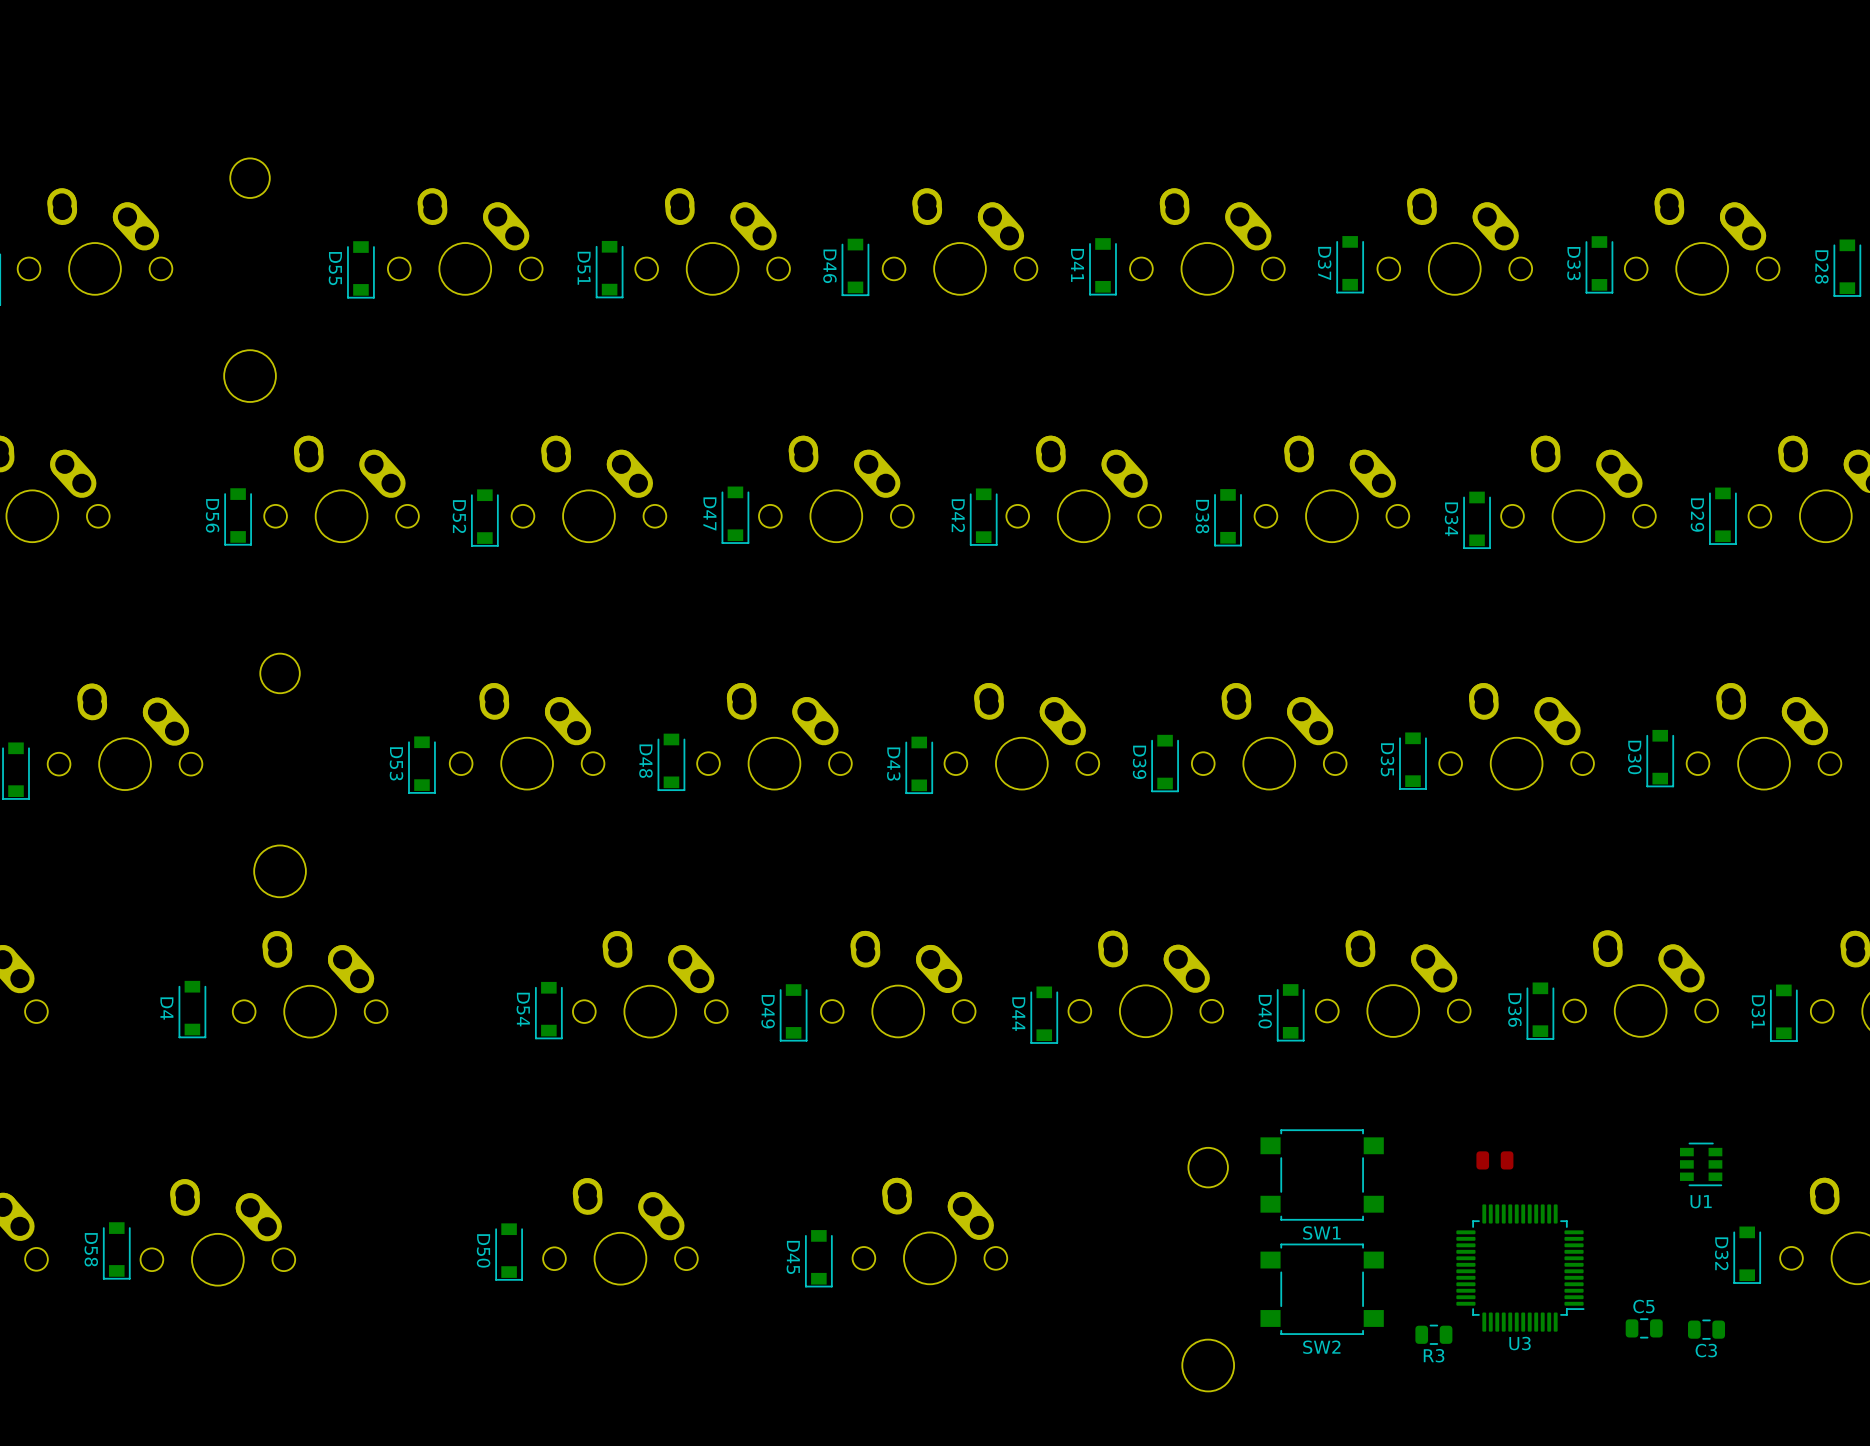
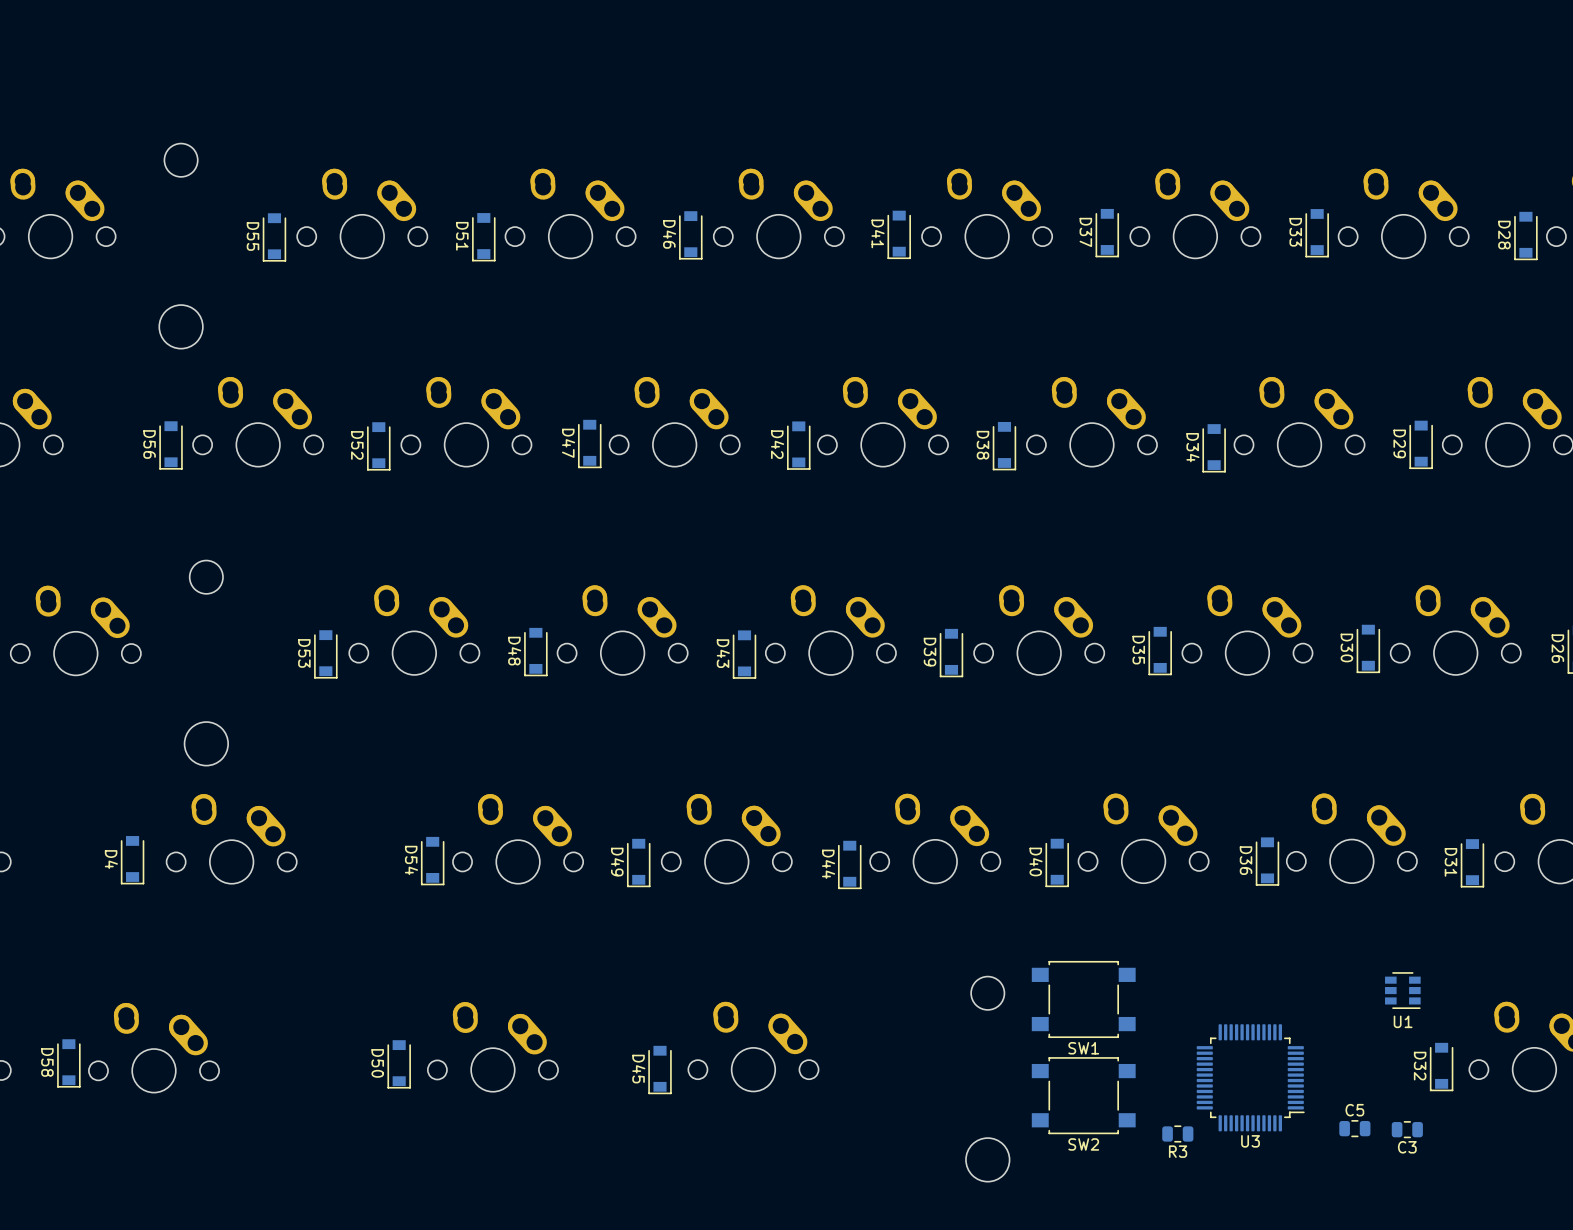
part: (1494, 1160) -> none

